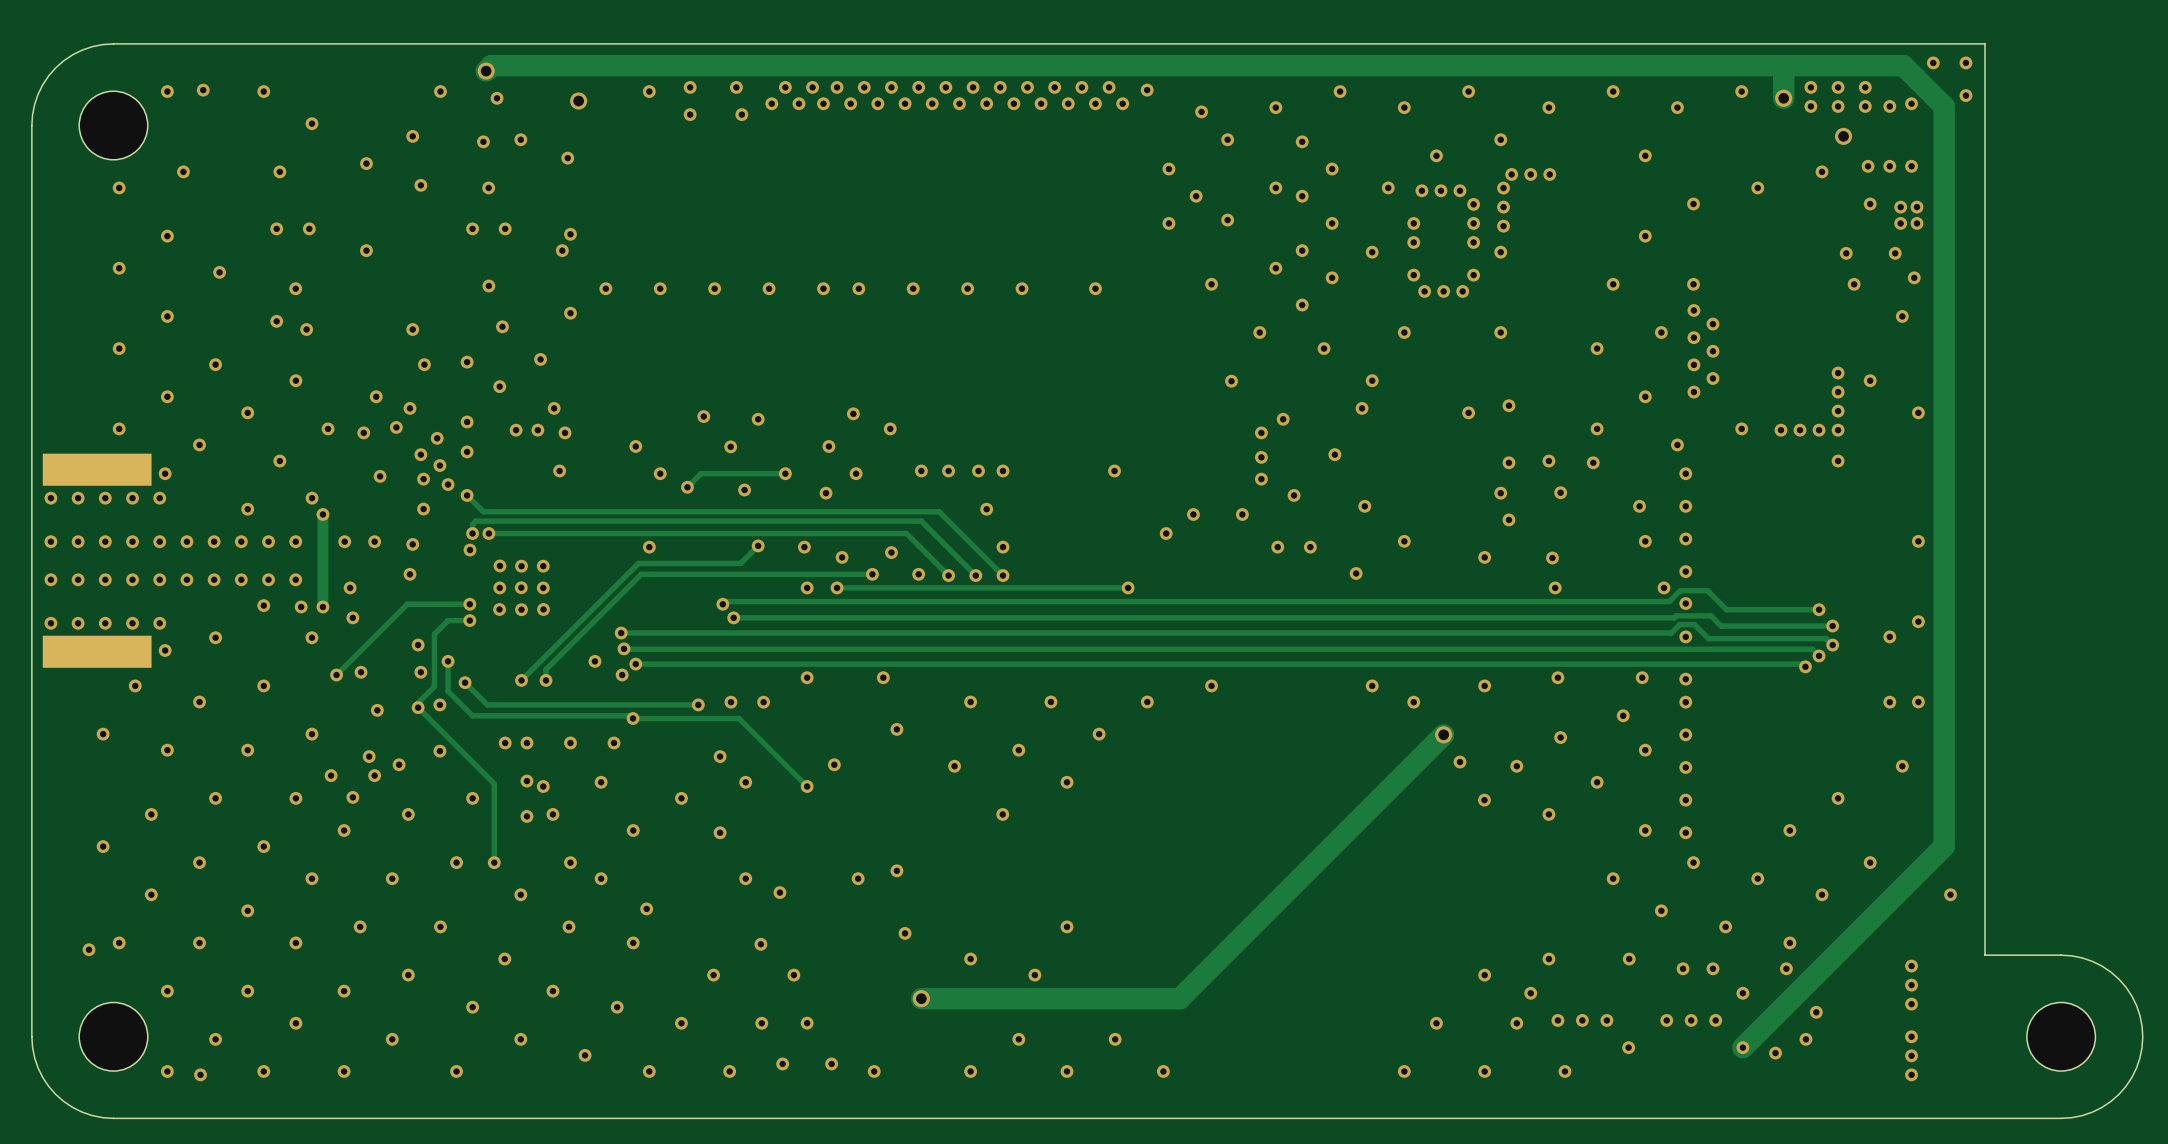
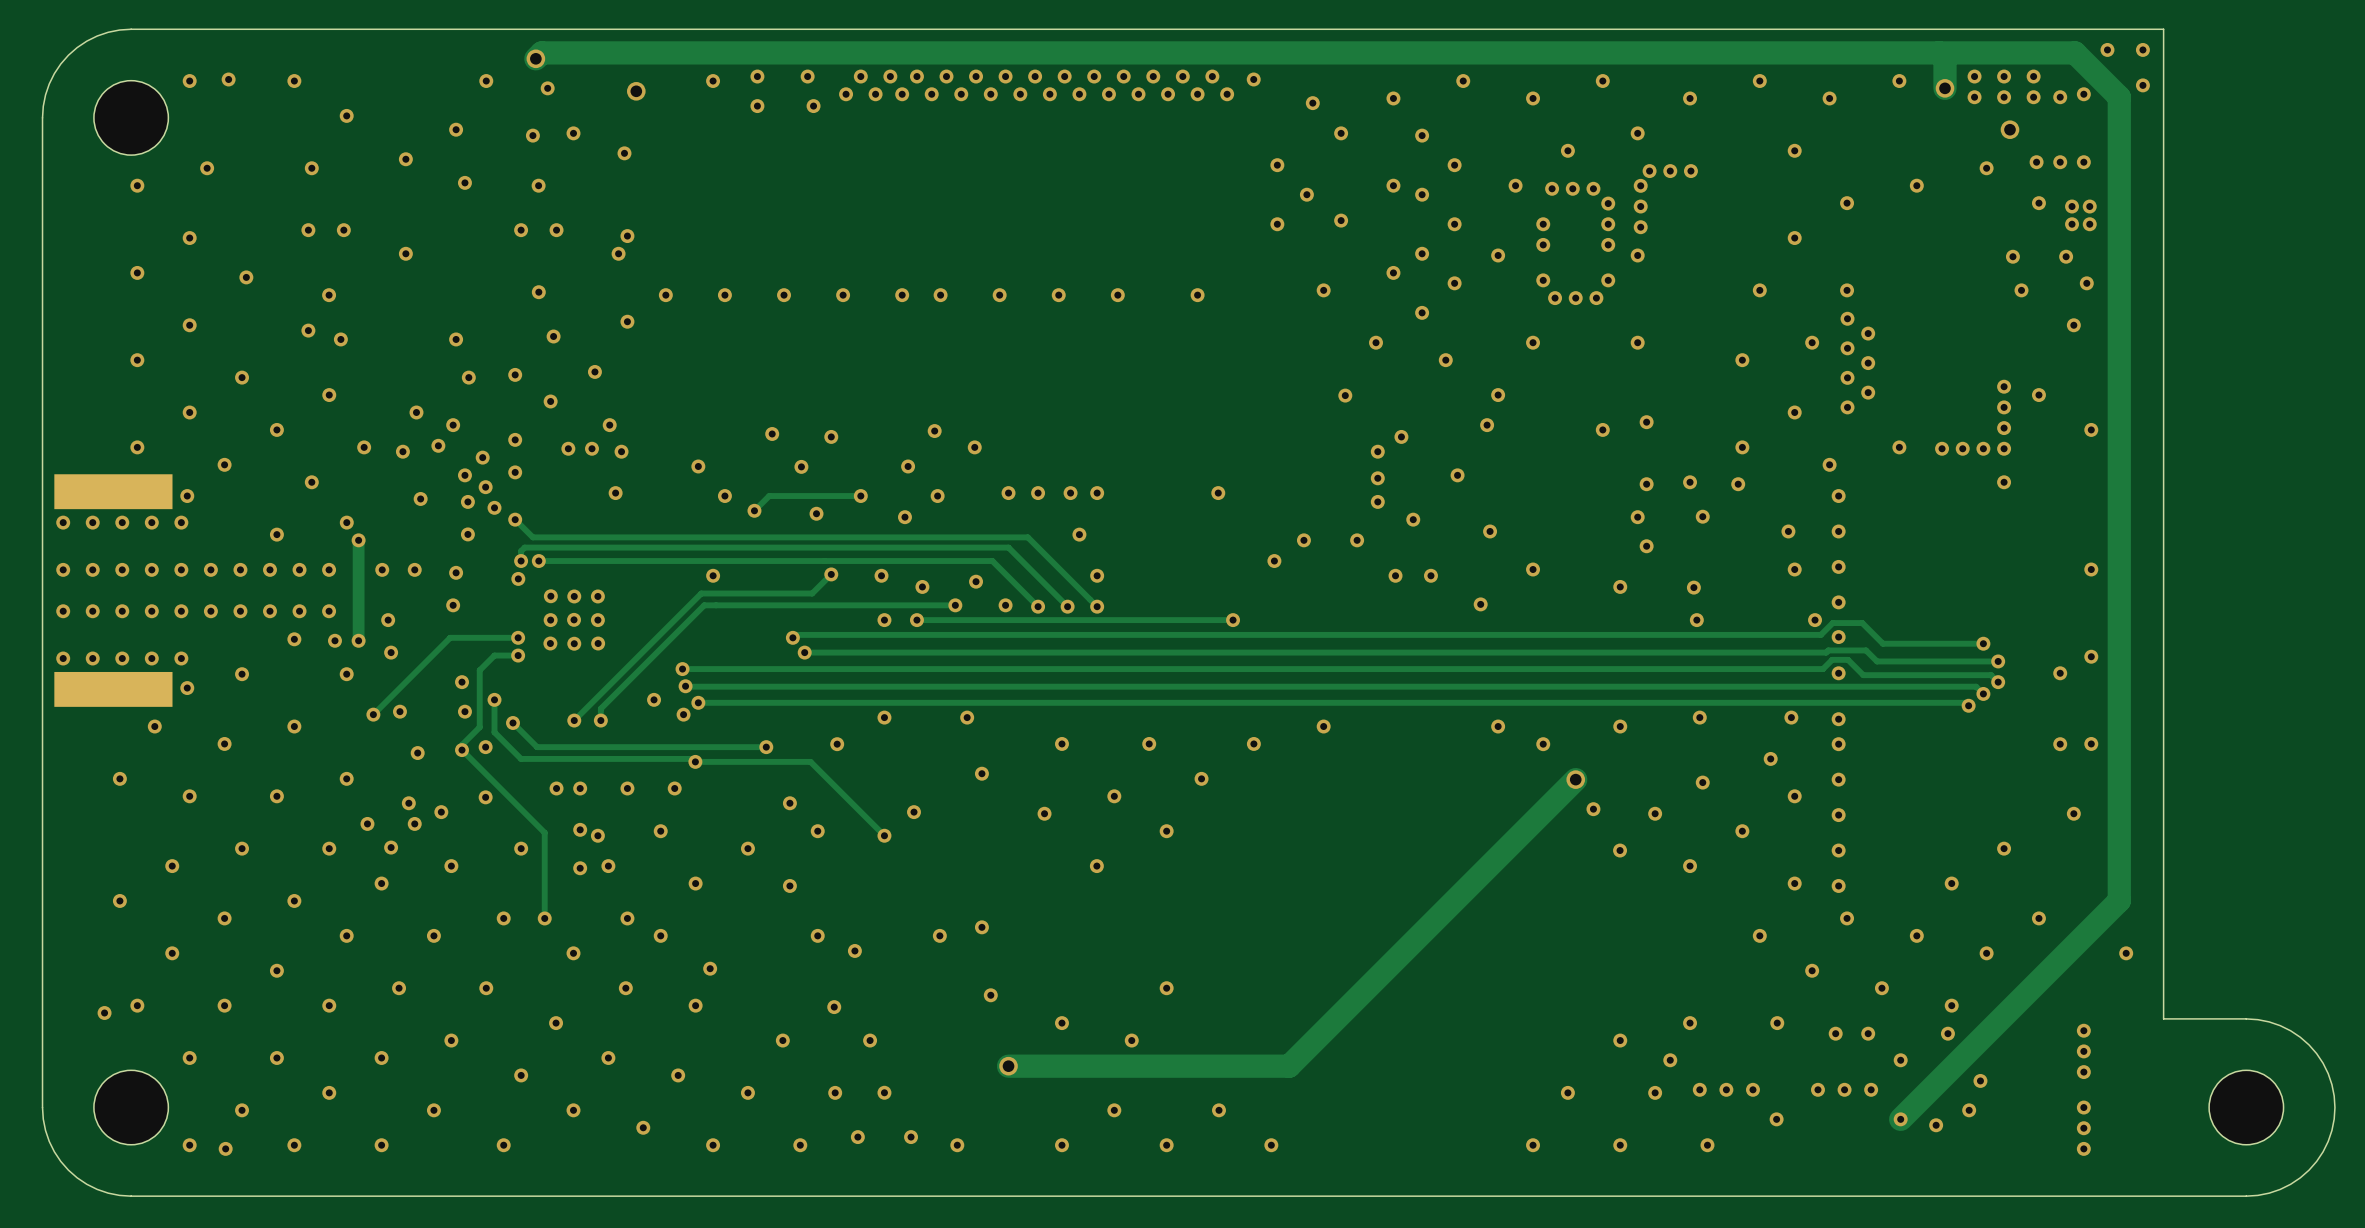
via: (730, 702) -> none

